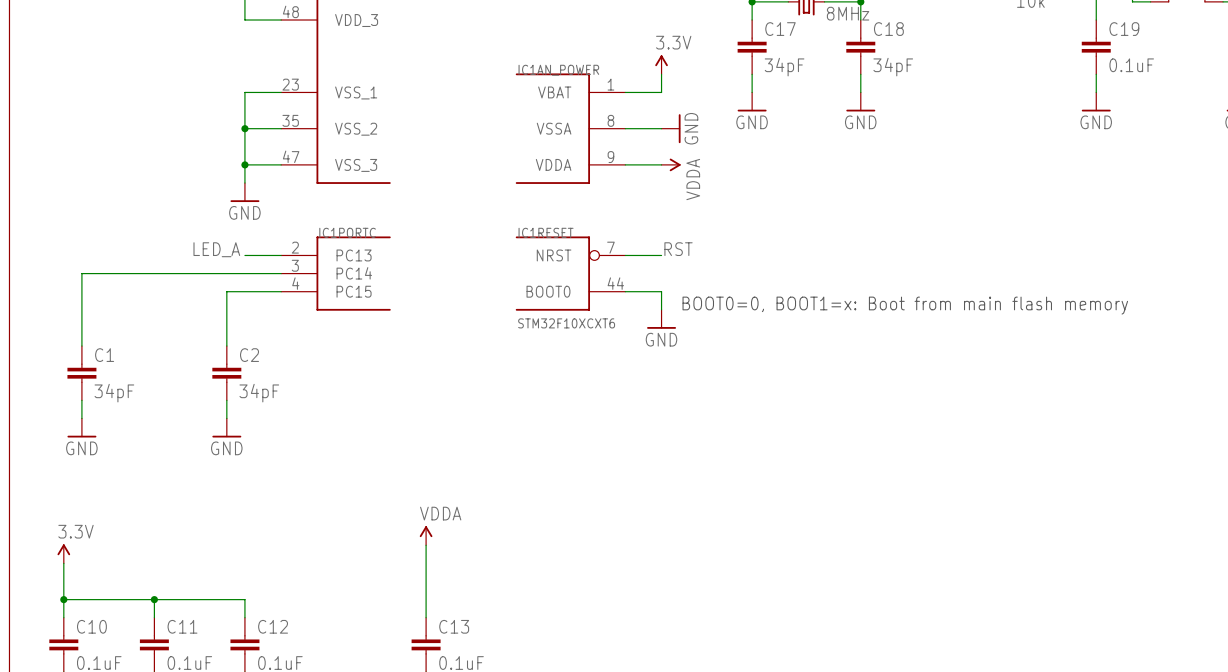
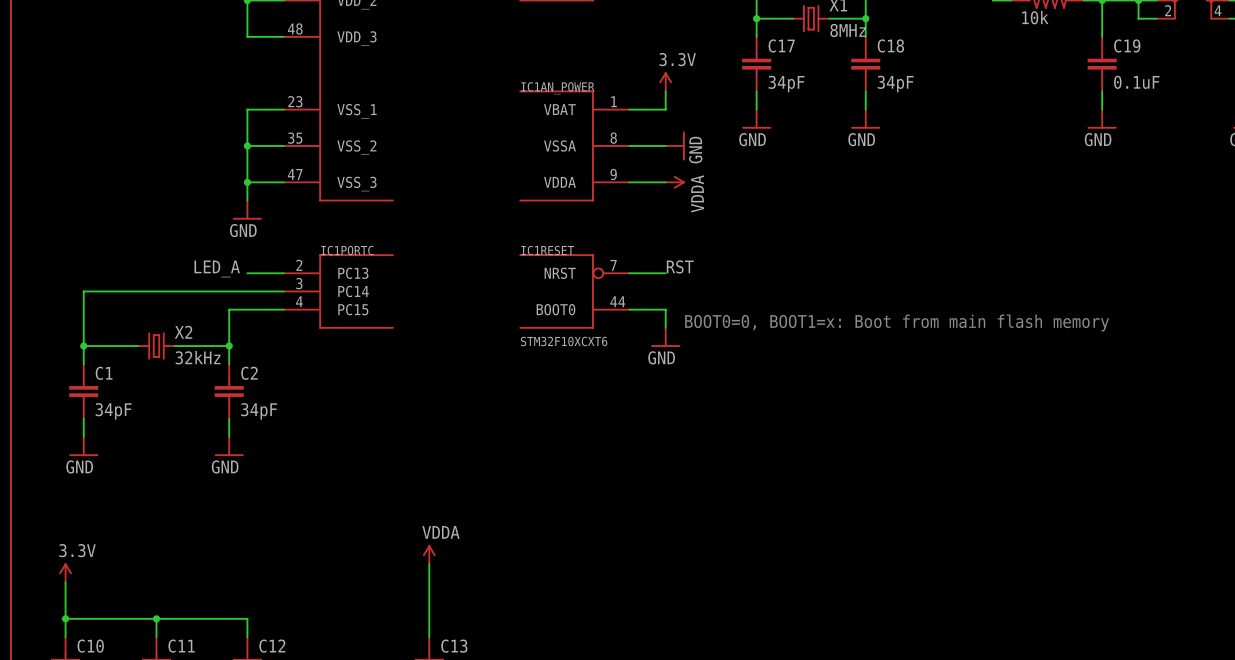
wire: none -> (83, 346) (138, 346)
junction: none -> (83, 346)
X2: none -> 32kHz (156, 346)
wire: none -> (174, 346) (229, 346)
junction: none -> (229, 346)

